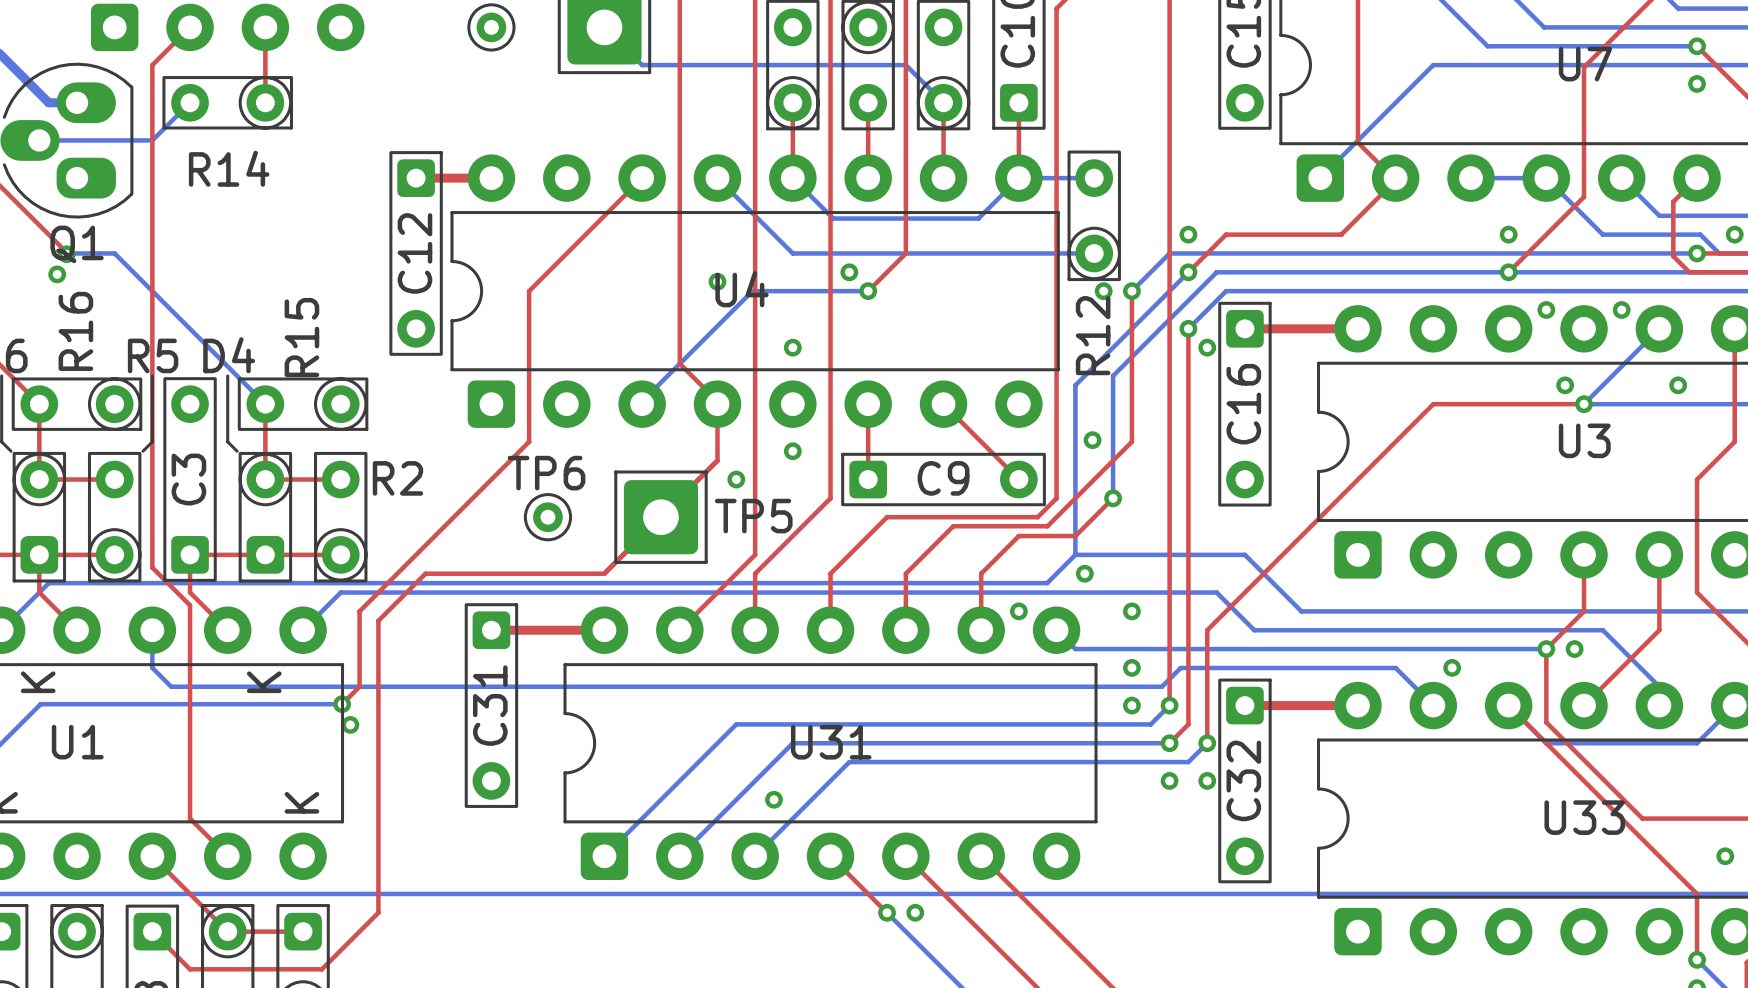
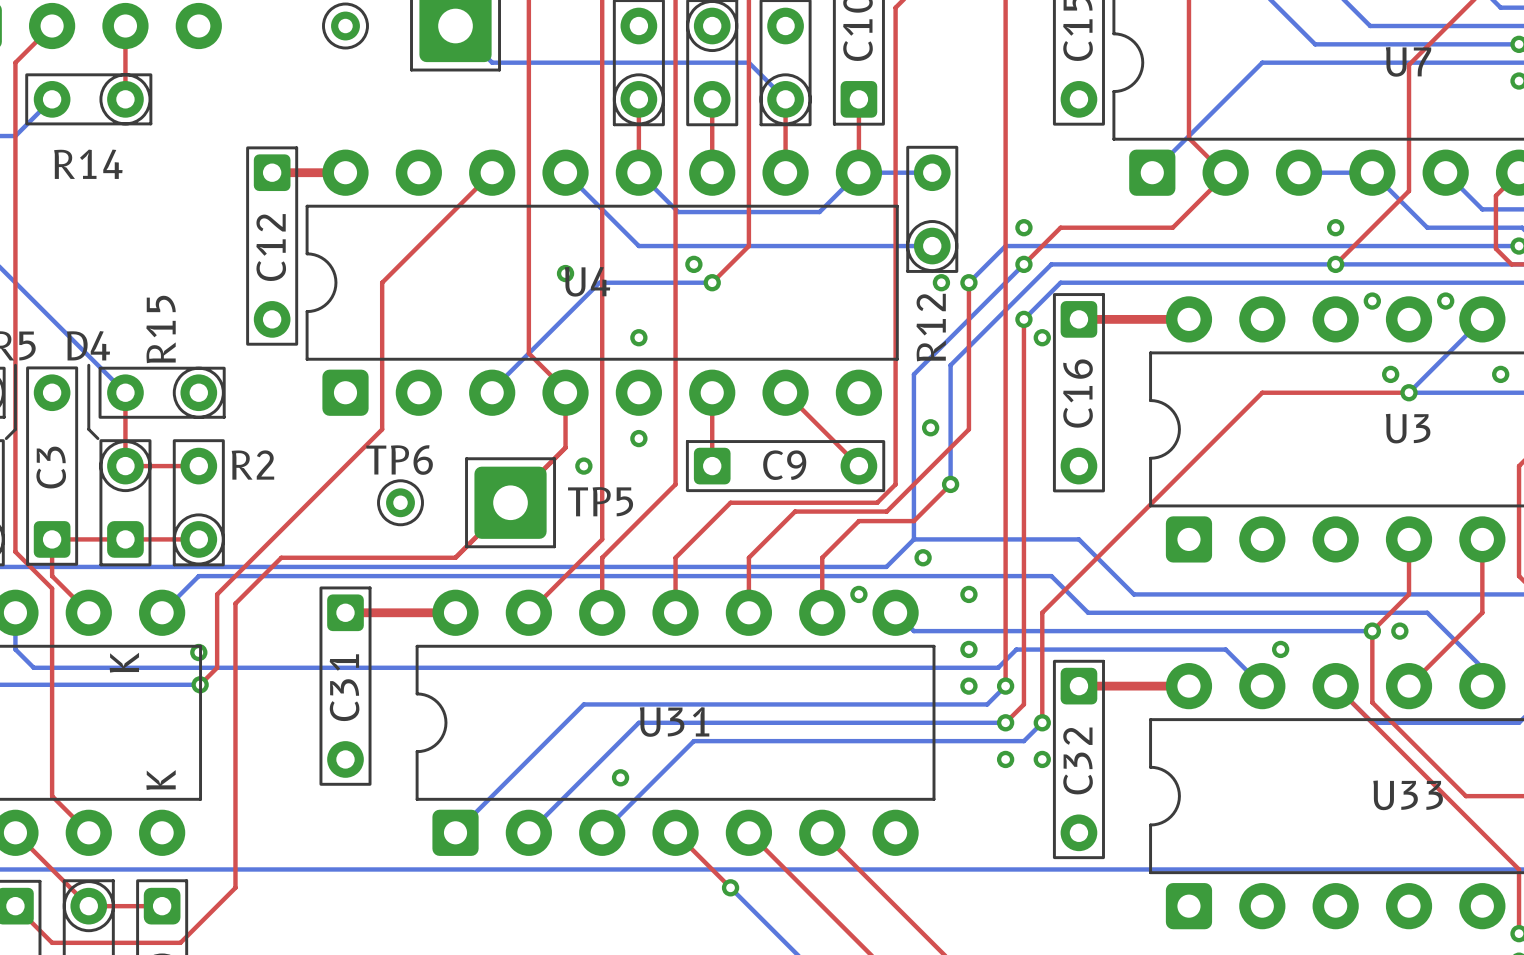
via position: (350, 724) -> (198, 652)
via: (915, 912) -> none

